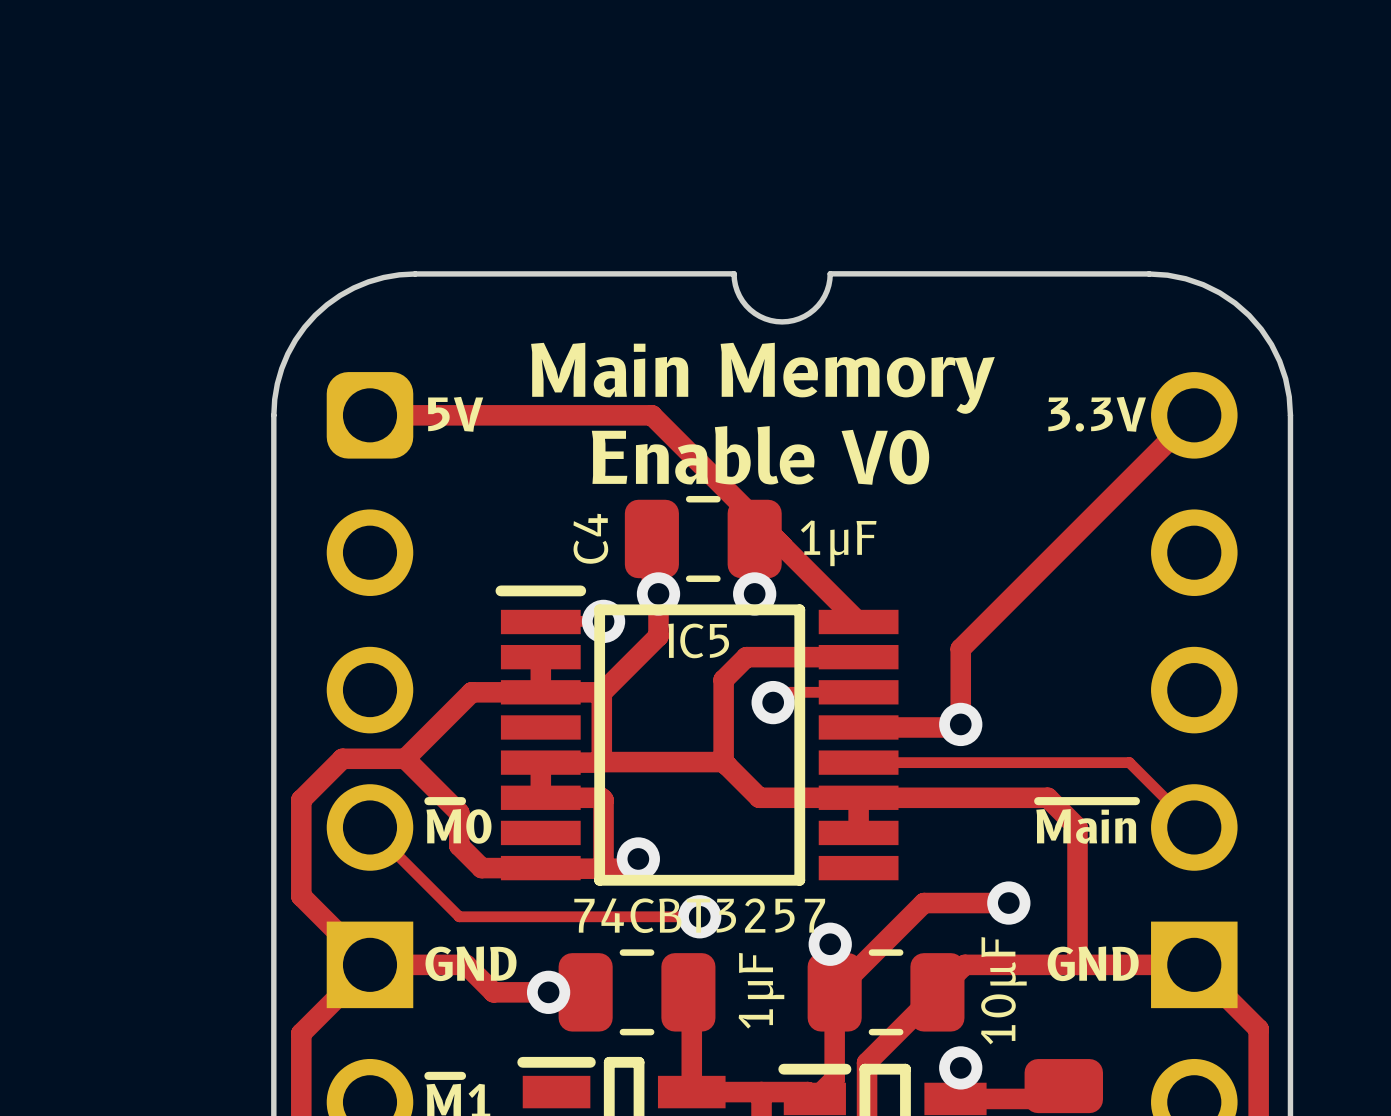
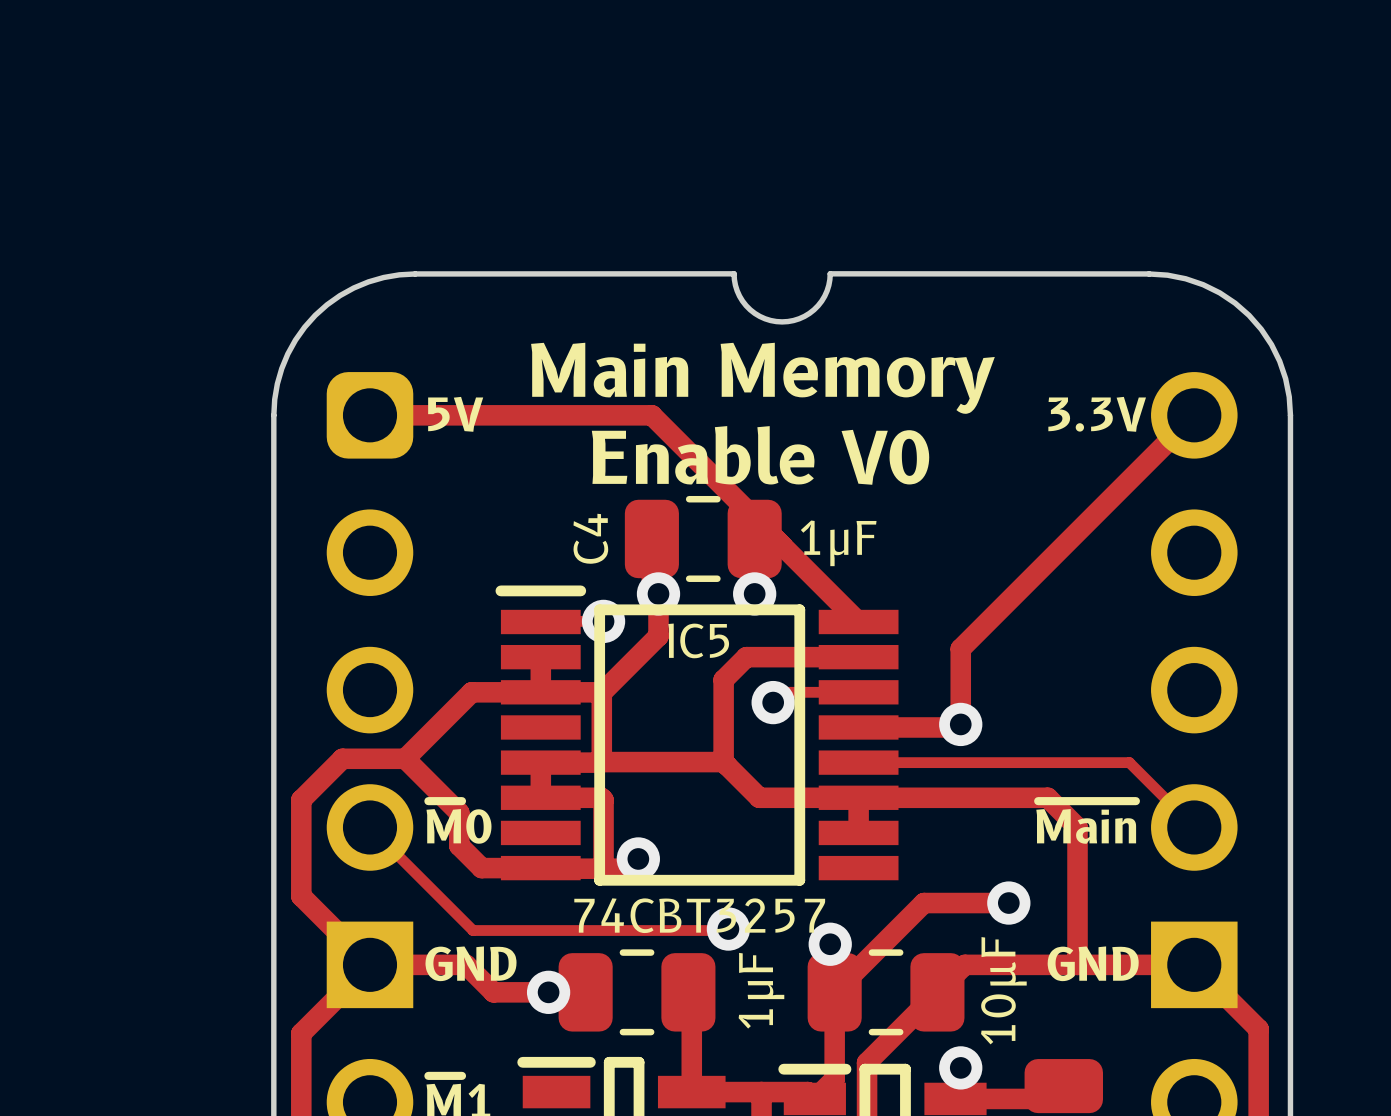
track: (459, 916) (699, 916) -> (459, 916) (473, 930) (728, 929)
via position: (699, 916) -> (728, 929)

